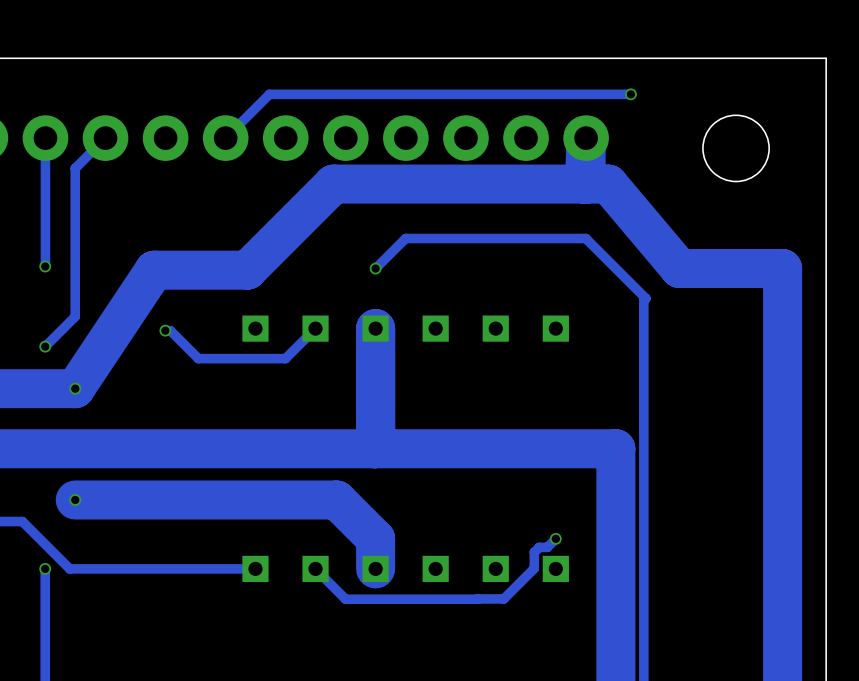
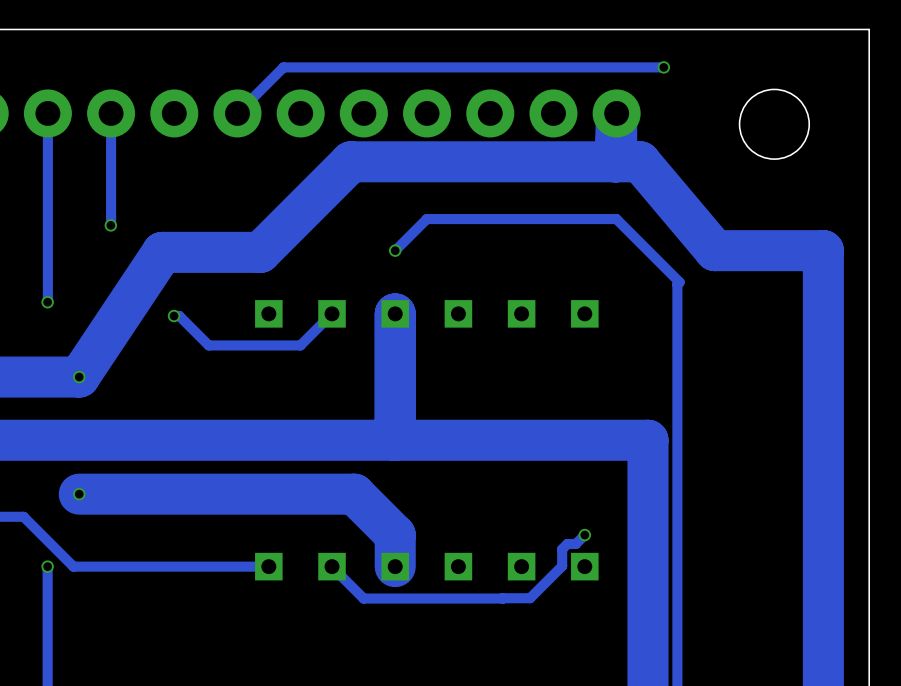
track: (105, 138) (75, 168) (75, 316) (45, 346) -> (111, 113) (110, 225)
via: none -> (110, 225)
track: none -> (47, 248) (47, 301)
via: (45, 266) -> none
via: none -> (47, 302)
via: (45, 346) -> none

